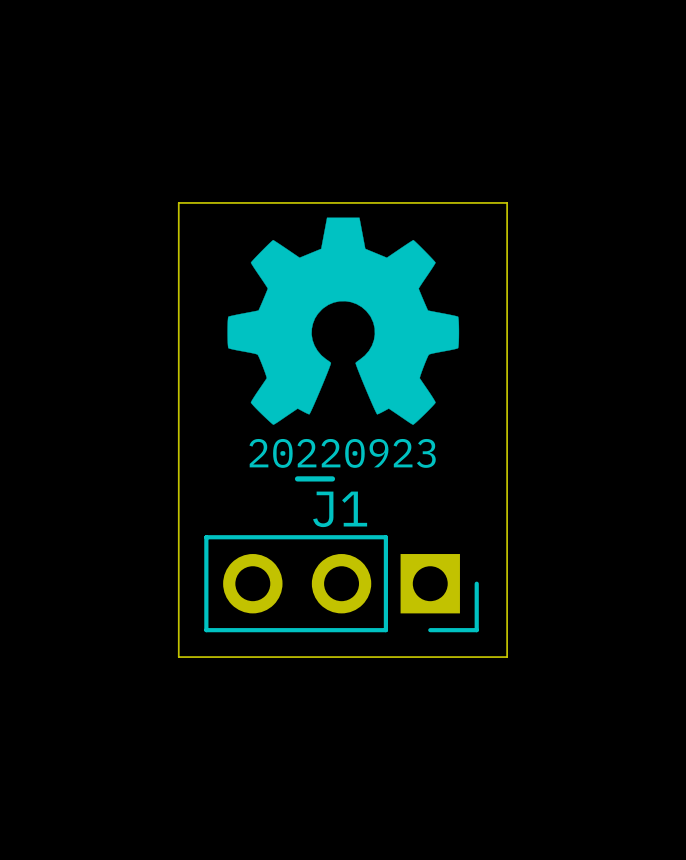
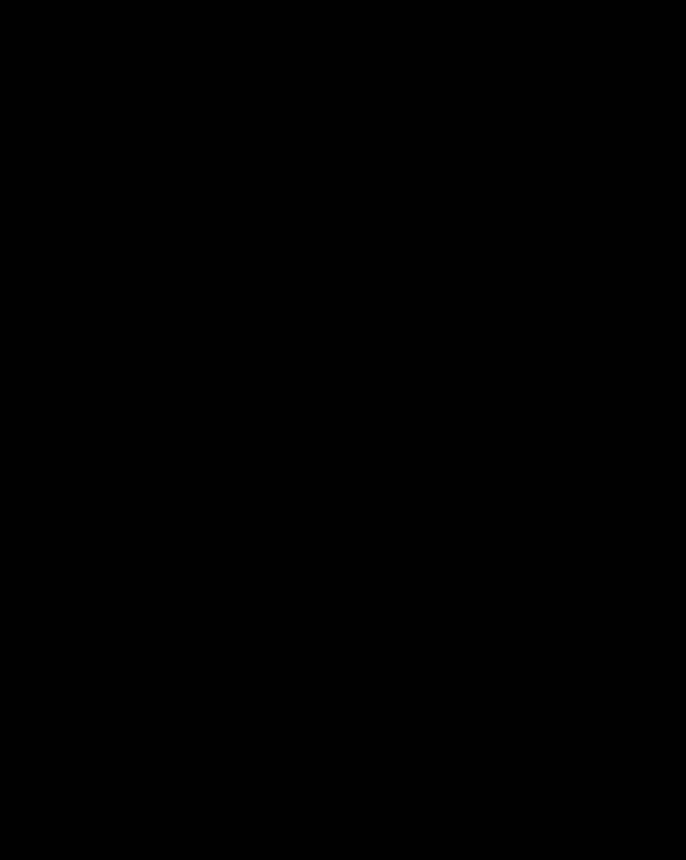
board edge: (507, 202) (507, 657) (178, 657) (178, 202) (507, 202) -> none
drawing: [227, 217, 460, 482] -> none
J1: (341, 583) -> none

